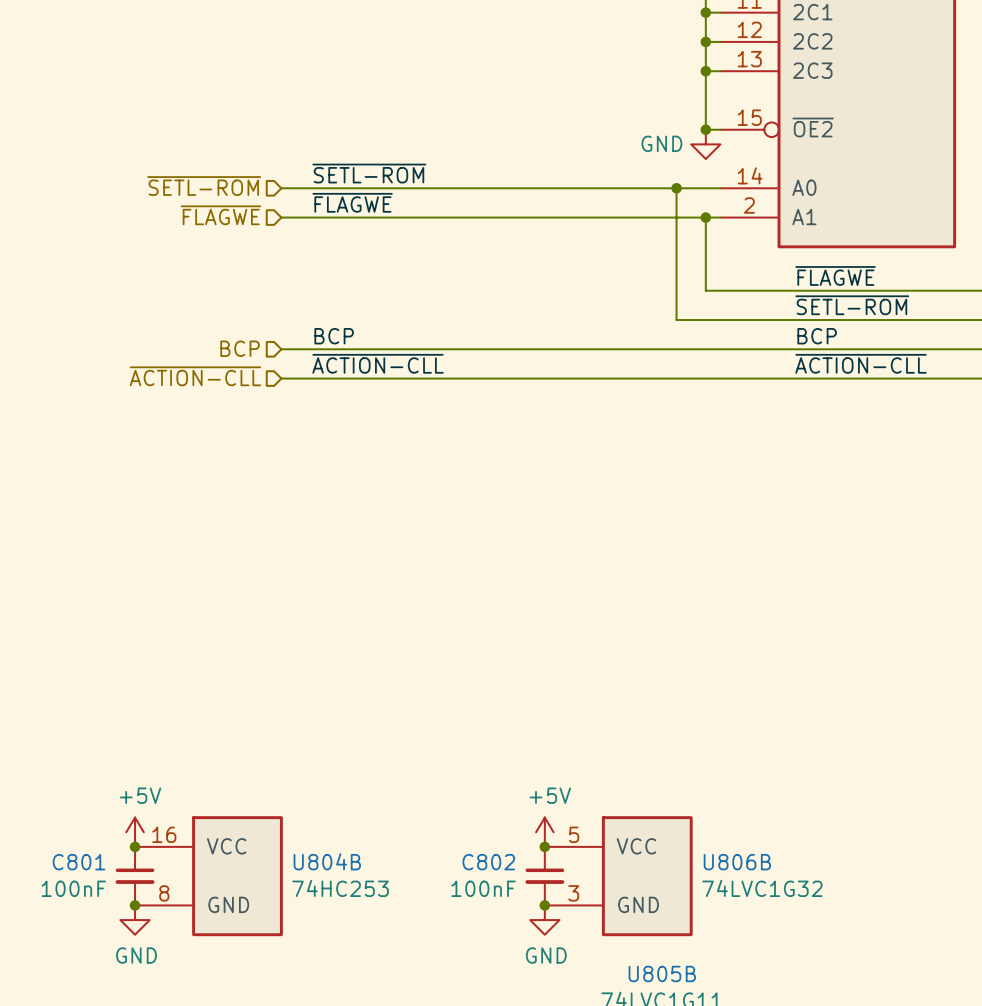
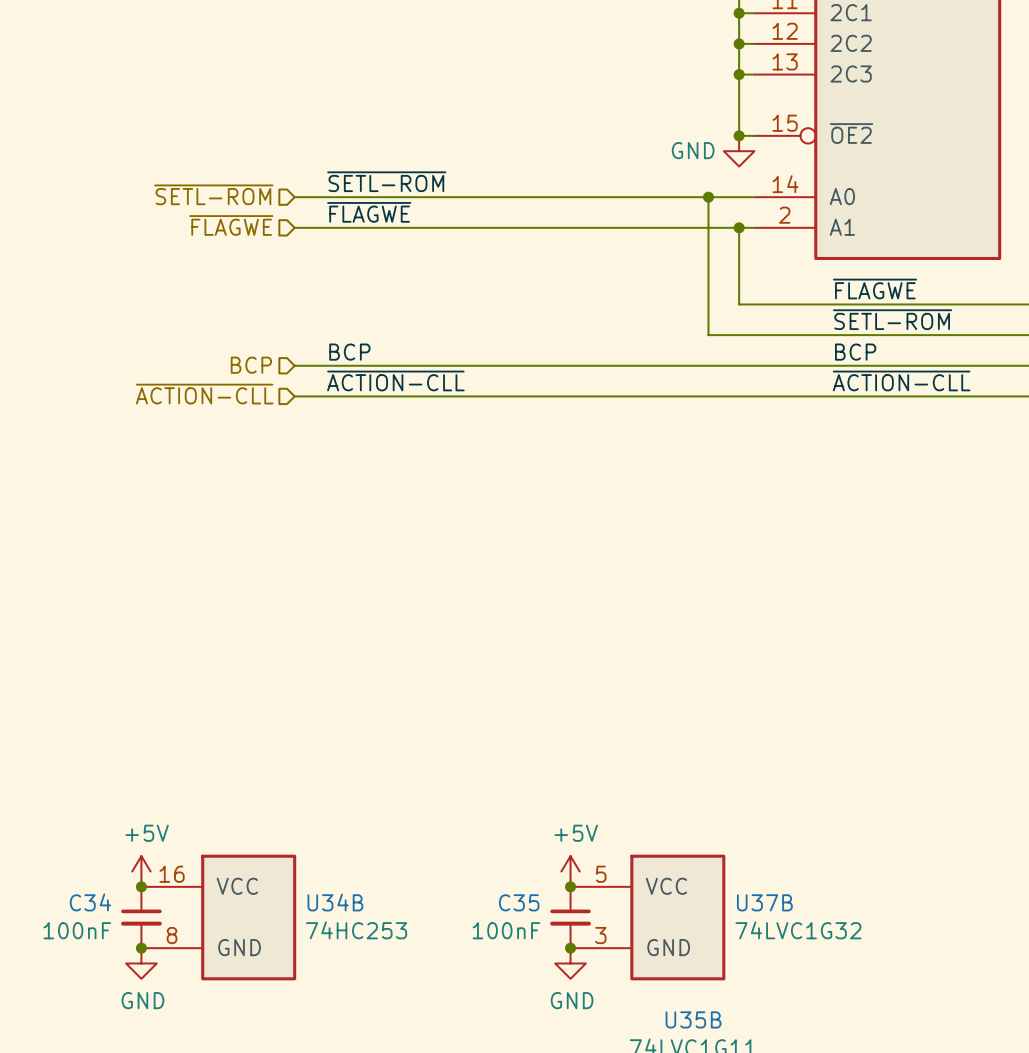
U804B name: U804B (327, 861) -> U34B (335, 902)
C801 name: C801 (79, 862) -> C34 (90, 902)
C802 name: C802 (488, 862) -> C35 (519, 902)
U806B name: U806B (737, 862) -> U37B (764, 902)
U805B name: U805B (662, 973) -> U35B (693, 1019)

